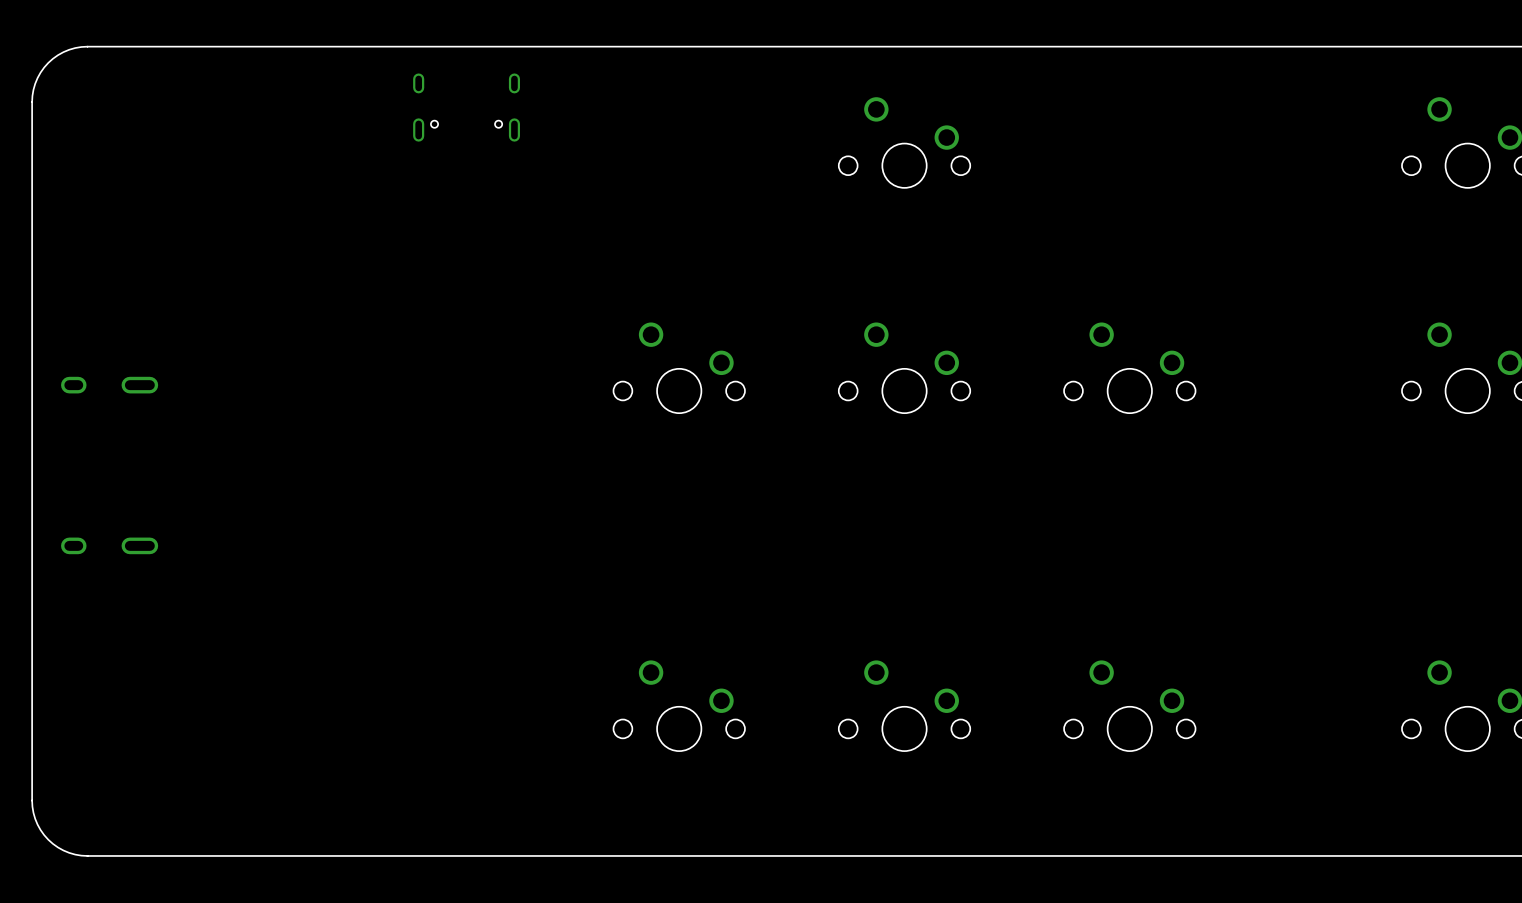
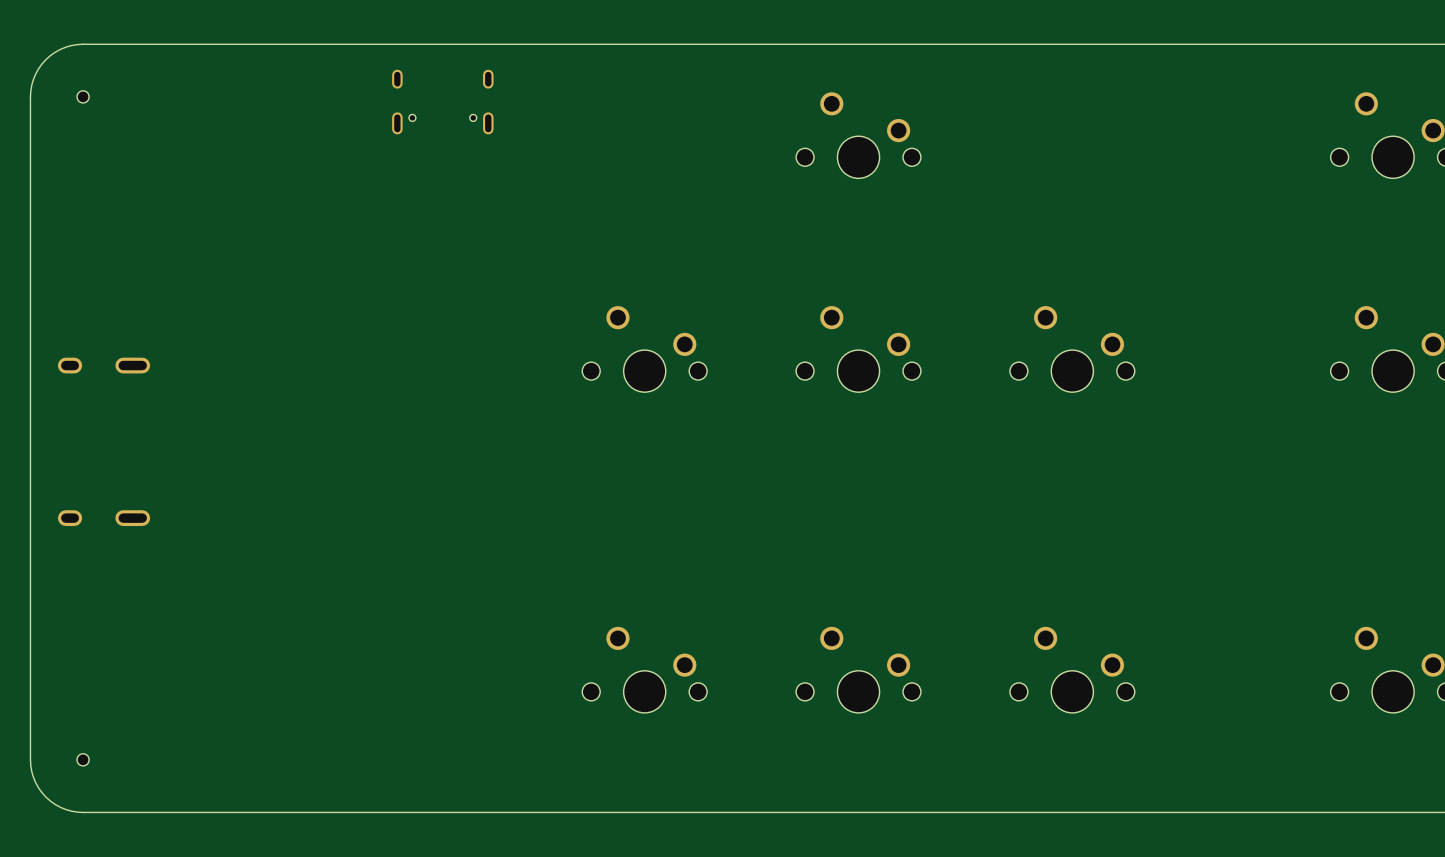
part: none -> (83, 96)
part: none -> (83, 759)

